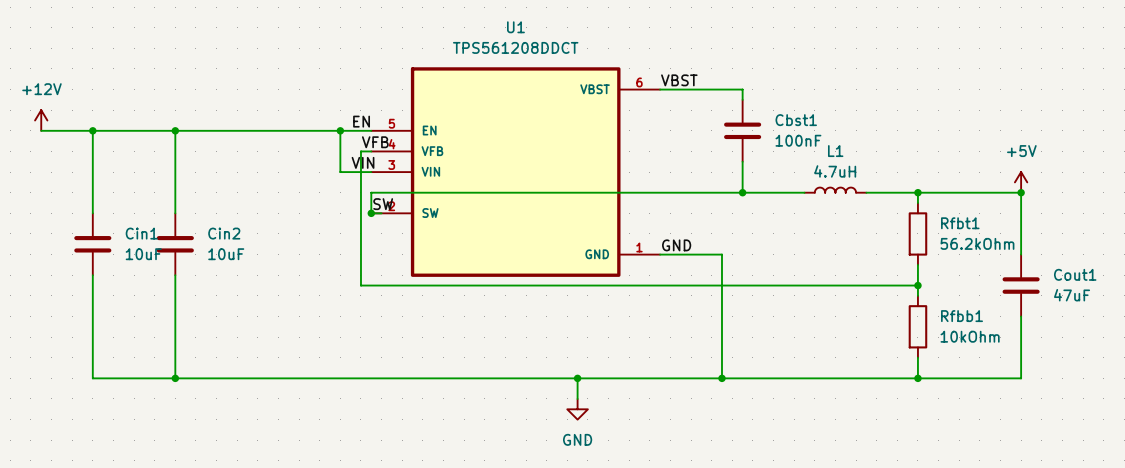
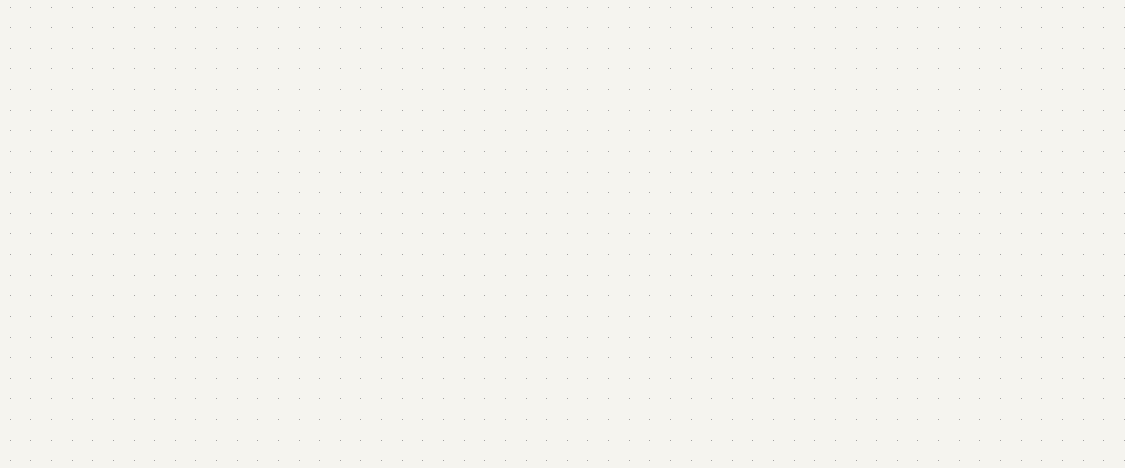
label: VBST (679, 80) -> none
wire: (660, 89) (742, 89) (742, 99) -> none
power symbol: +12V (41, 120) -> none
label: EN (361, 121) -> none
wire: (41, 130) (371, 130) -> none
wire: (92, 130) (92, 213) -> none
junction: (92, 130) -> none
wire: (175, 130) (175, 213) -> none
junction: (175, 130) -> none
wire: (340, 130) (340, 172) (371, 172) -> none
junction: (340, 130) -> none
Cbst1: 100nF (742, 130) -> none
label: VFB (375, 142) -> none
wire: (371, 151) (360, 151) (360, 285) (917, 285) -> none
wire: (742, 161) (742, 192) -> none
label: VIN (363, 162) -> none
U1: TPS561208DDCT (515, 172) -> none
power symbol: +5V (1021, 182) -> none
L1: 4.7uH (835, 190) -> none
junction: (742, 192) -> none
wire: (804, 192) (371, 192) (371, 213) (381, 213) -> none
wire: (866, 192) (1021, 192) (1021, 254) -> none
wire: (917, 192) (917, 203) -> none
junction: (917, 192) -> none
junction: (1021, 192) -> none
label: SW (383, 204) -> none
junction: (371, 213) -> none
Rfbt1: 56.2kOhm (917, 233) -> none
Cin1: 10uF (92, 244) -> none
Cin2: 10uF (175, 244) -> none
label: GND (676, 245) -> none
wire: (660, 254) (721, 254) (721, 378) -> none
wire: (917, 264) (917, 295) -> none
wire: (92, 275) (92, 378) (1021, 378) (1021, 316) -> none
wire: (175, 275) (175, 378) -> none
junction: (917, 285) -> none
Cout1: 47uF (1021, 285) -> none
Rfbb1: 10kOhm (917, 326) -> none
wire: (917, 357) (917, 378) -> none
junction: (175, 378) -> none
wire: (577, 378) (577, 398) -> none
junction: (577, 378) -> none
junction: (721, 378) -> none
junction: (917, 378) -> none
power symbol: GND (577, 409) -> none

